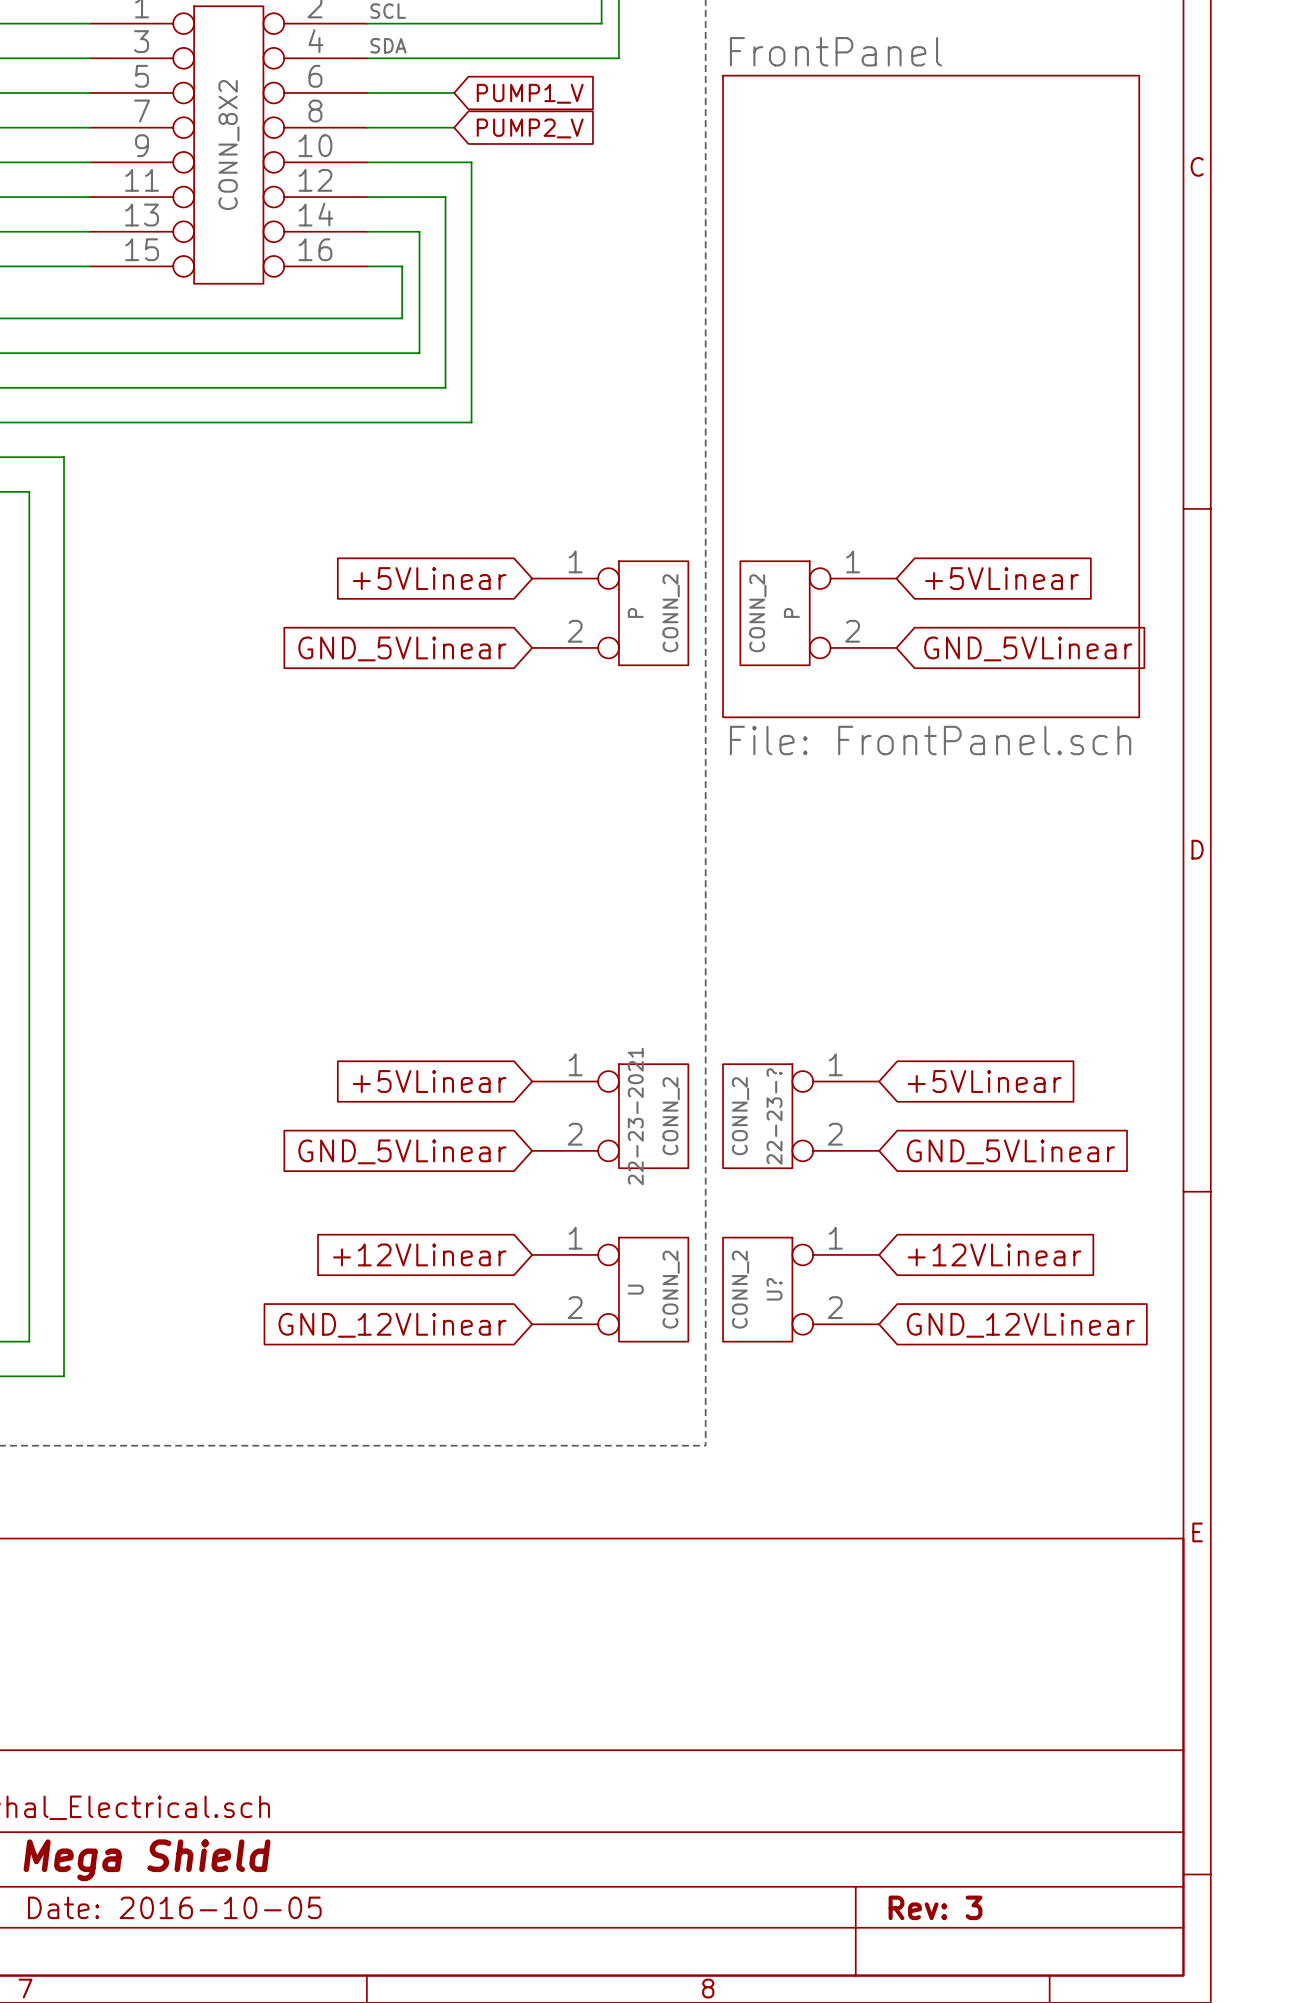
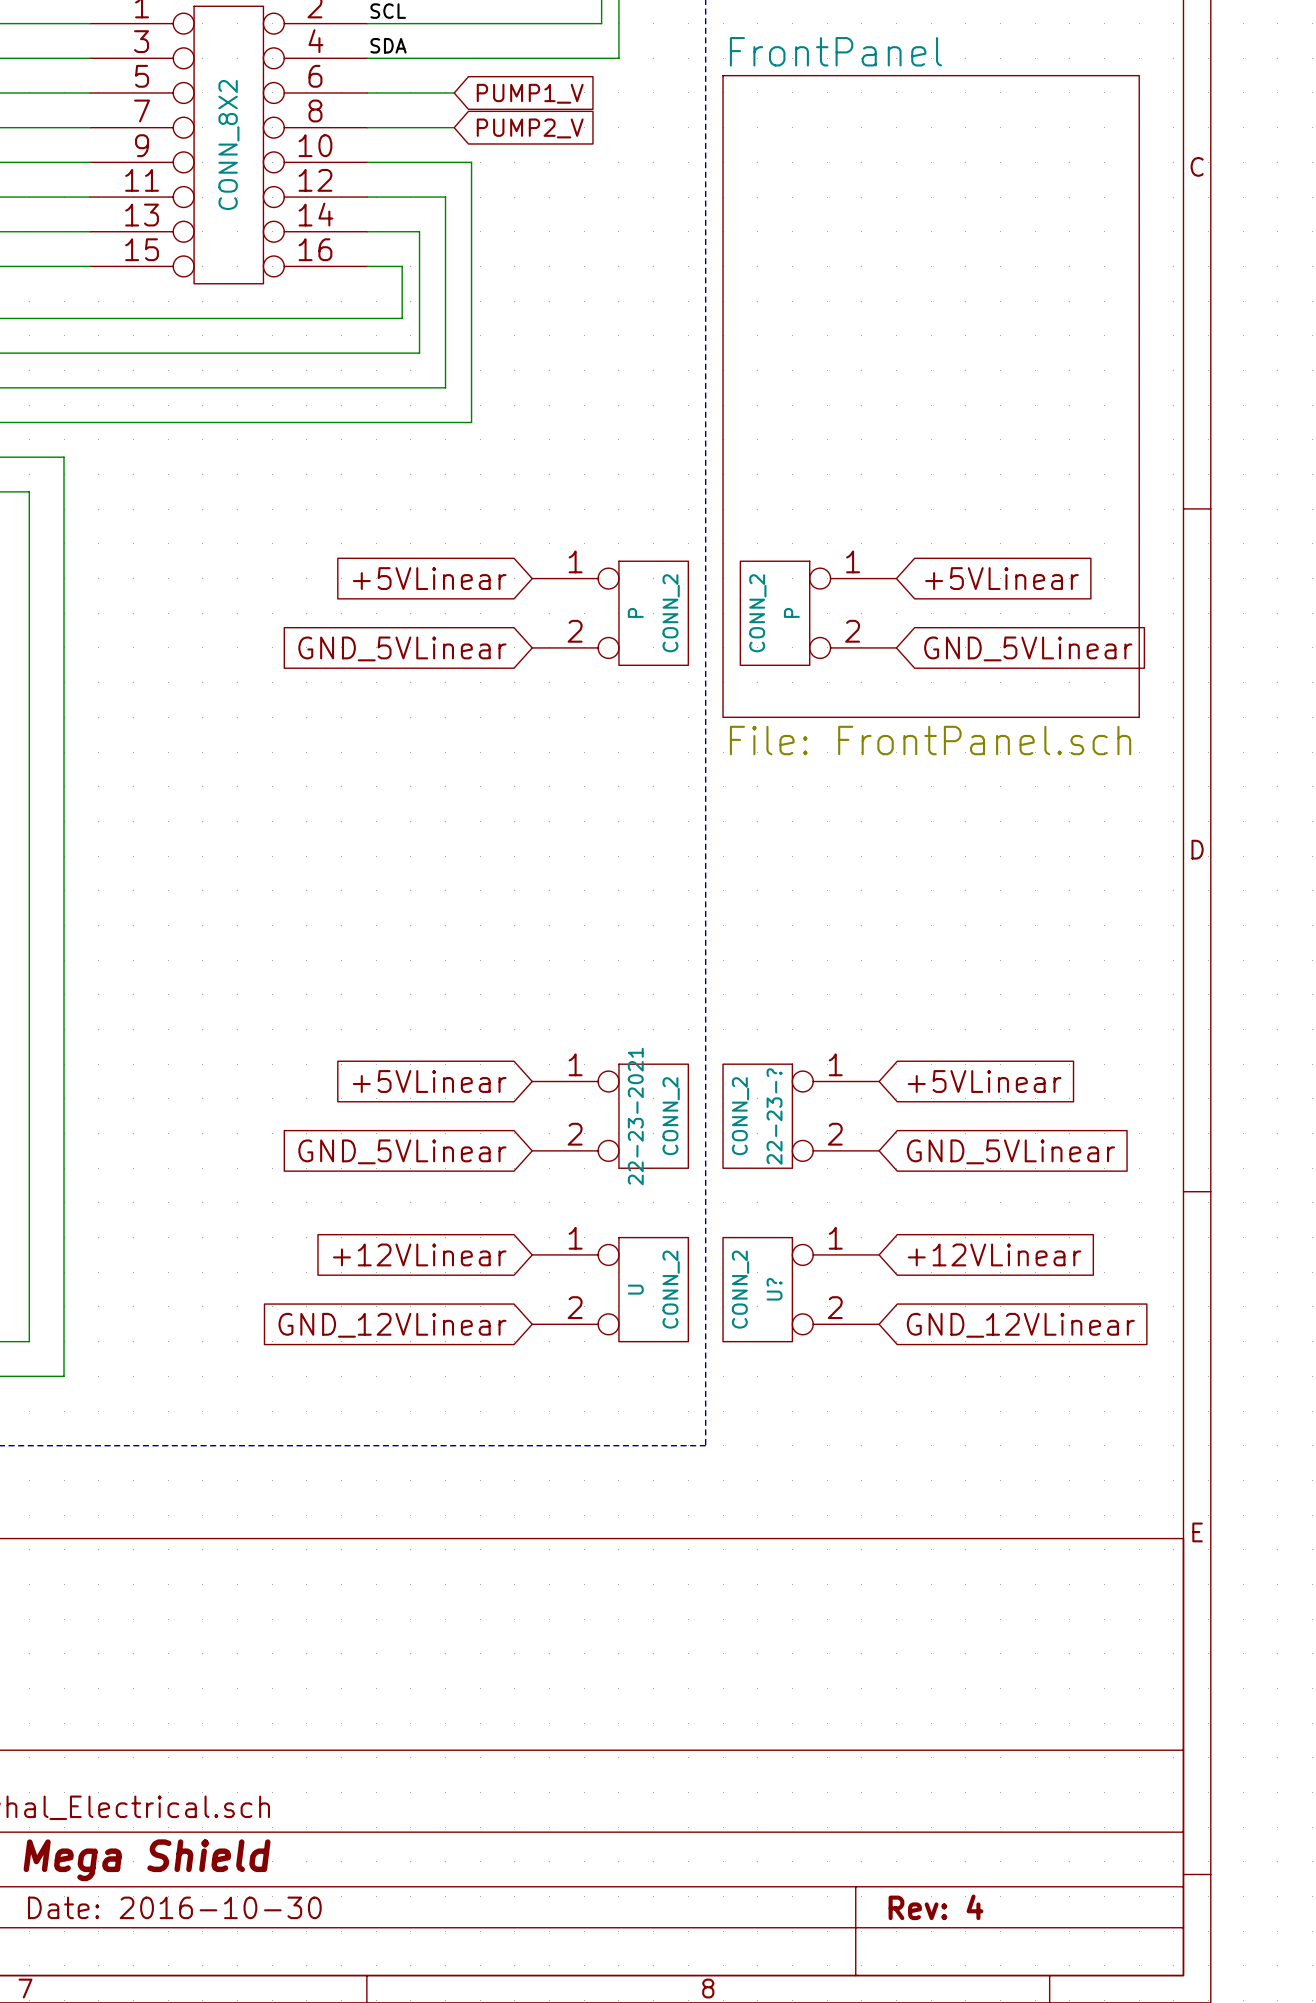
title block: Date: 2016-10-05 (174, 1907) -> Date: 2016-10-30 (174, 1907)
title block: Rev: 3 (935, 1907) -> Rev: 4 (935, 1907)

